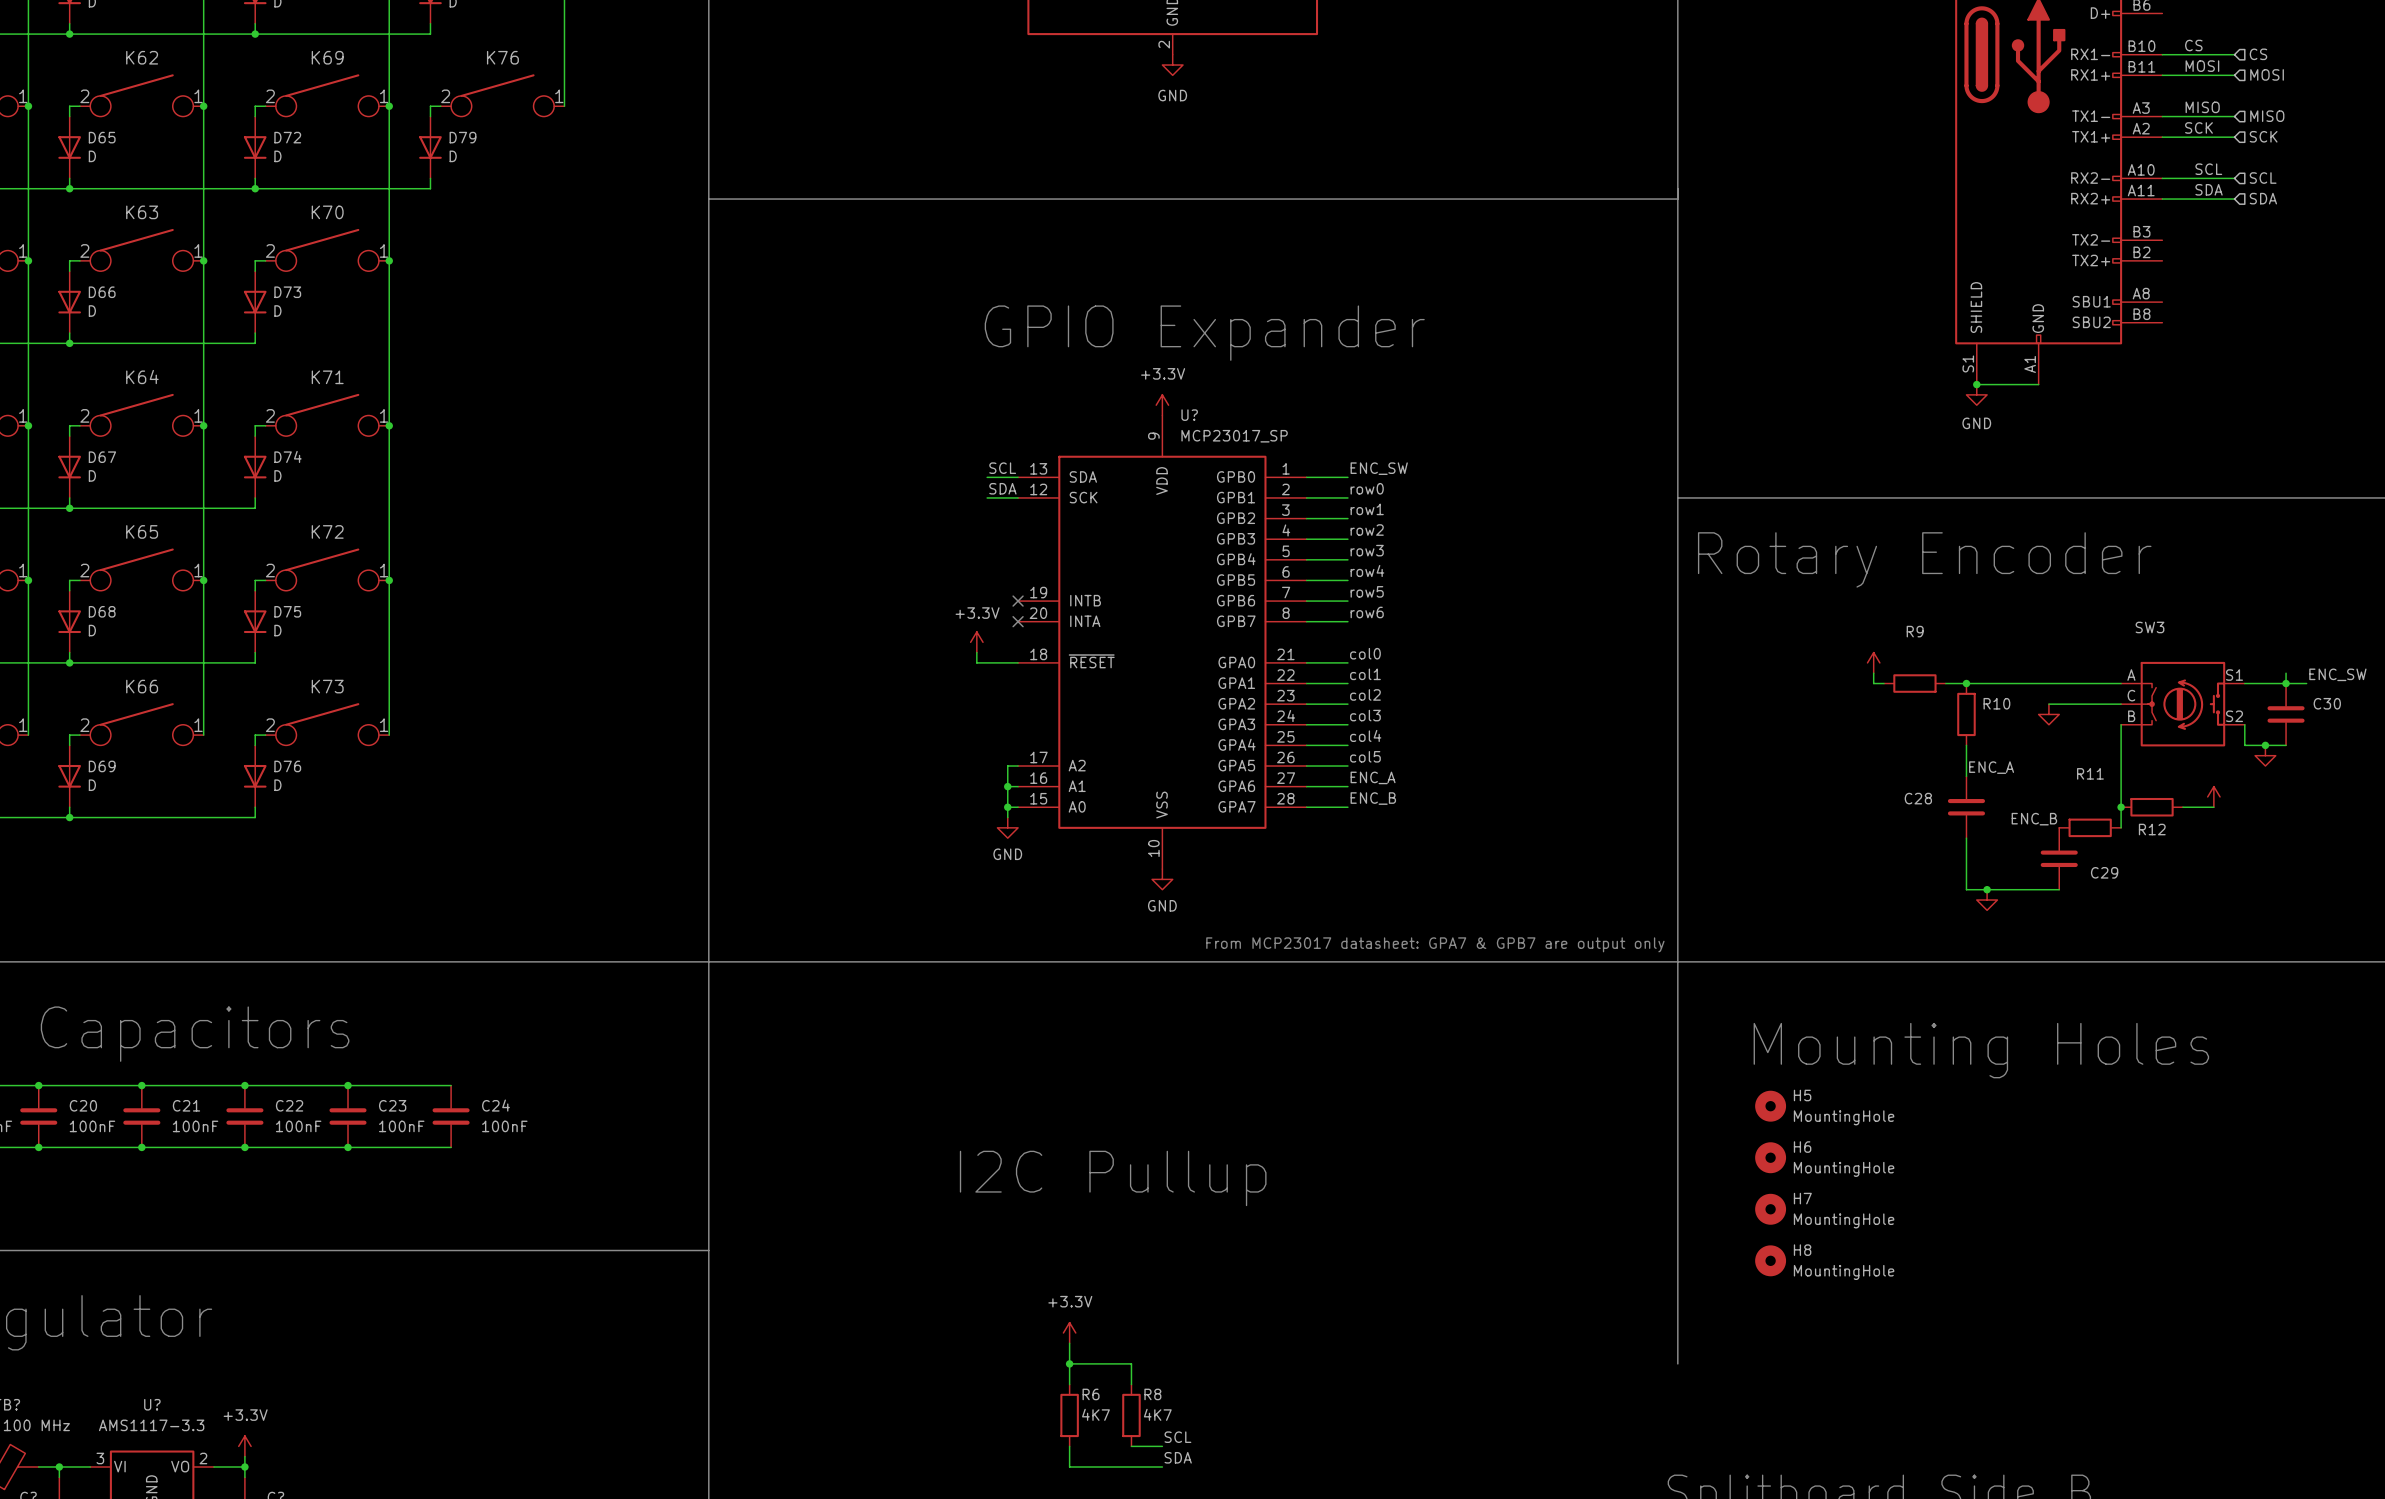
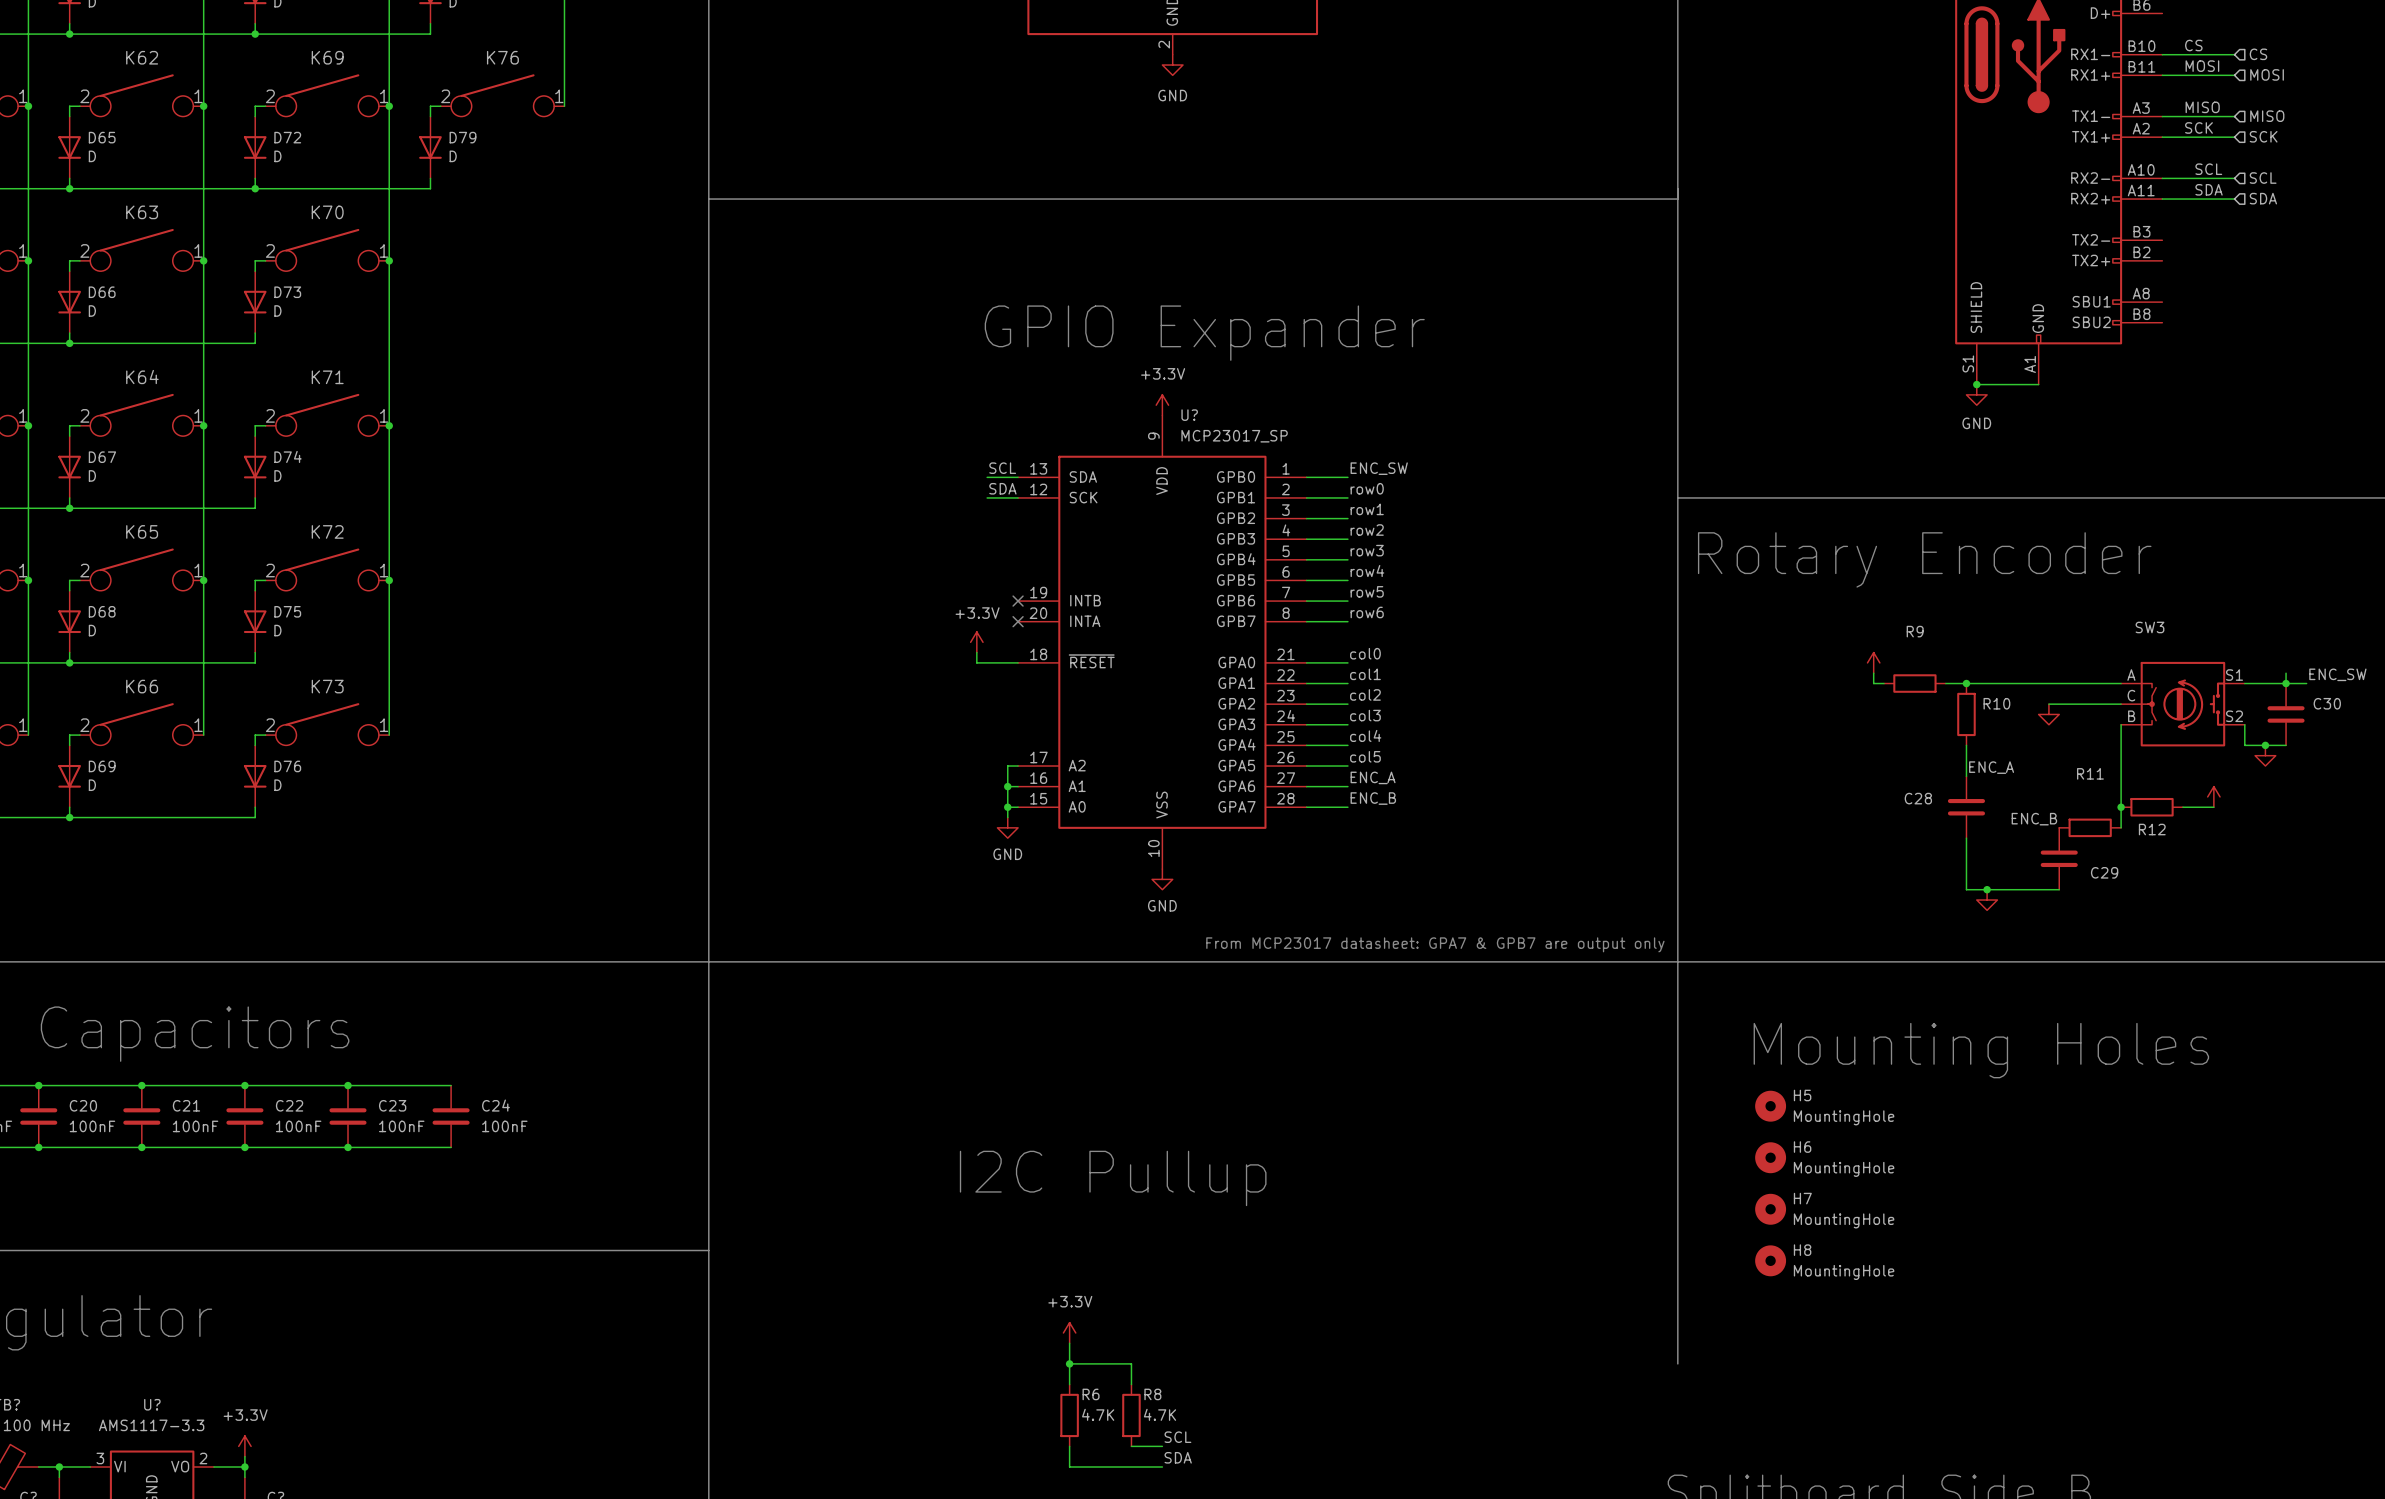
R6 value: 4K7 (1095, 1414) -> 4.7K (1098, 1414)
R8 value: 4K7 (1157, 1414) -> 4.7K (1160, 1414)

